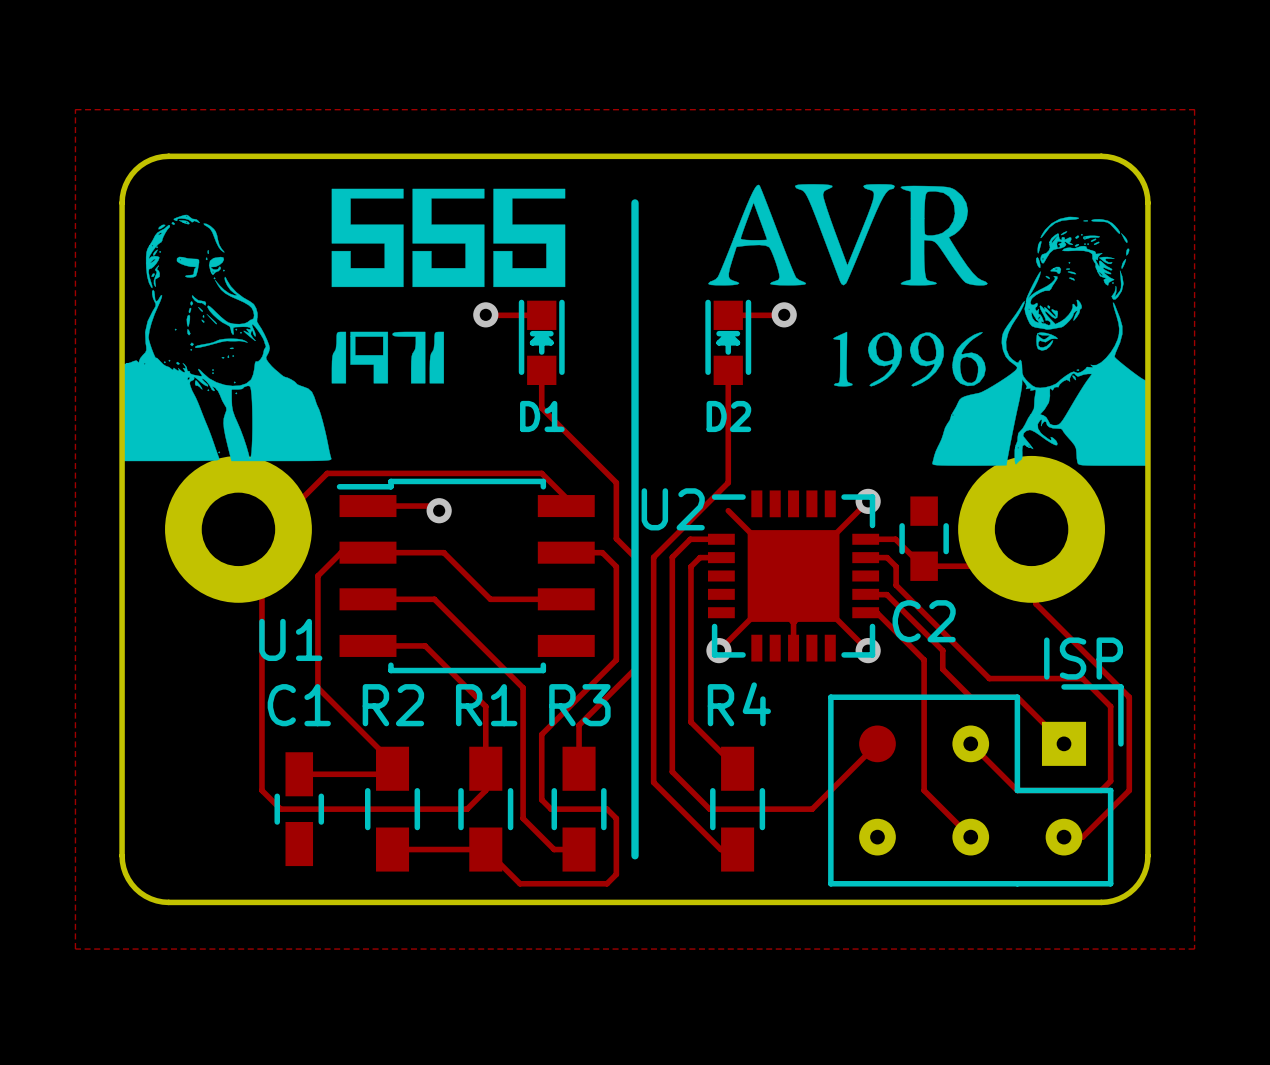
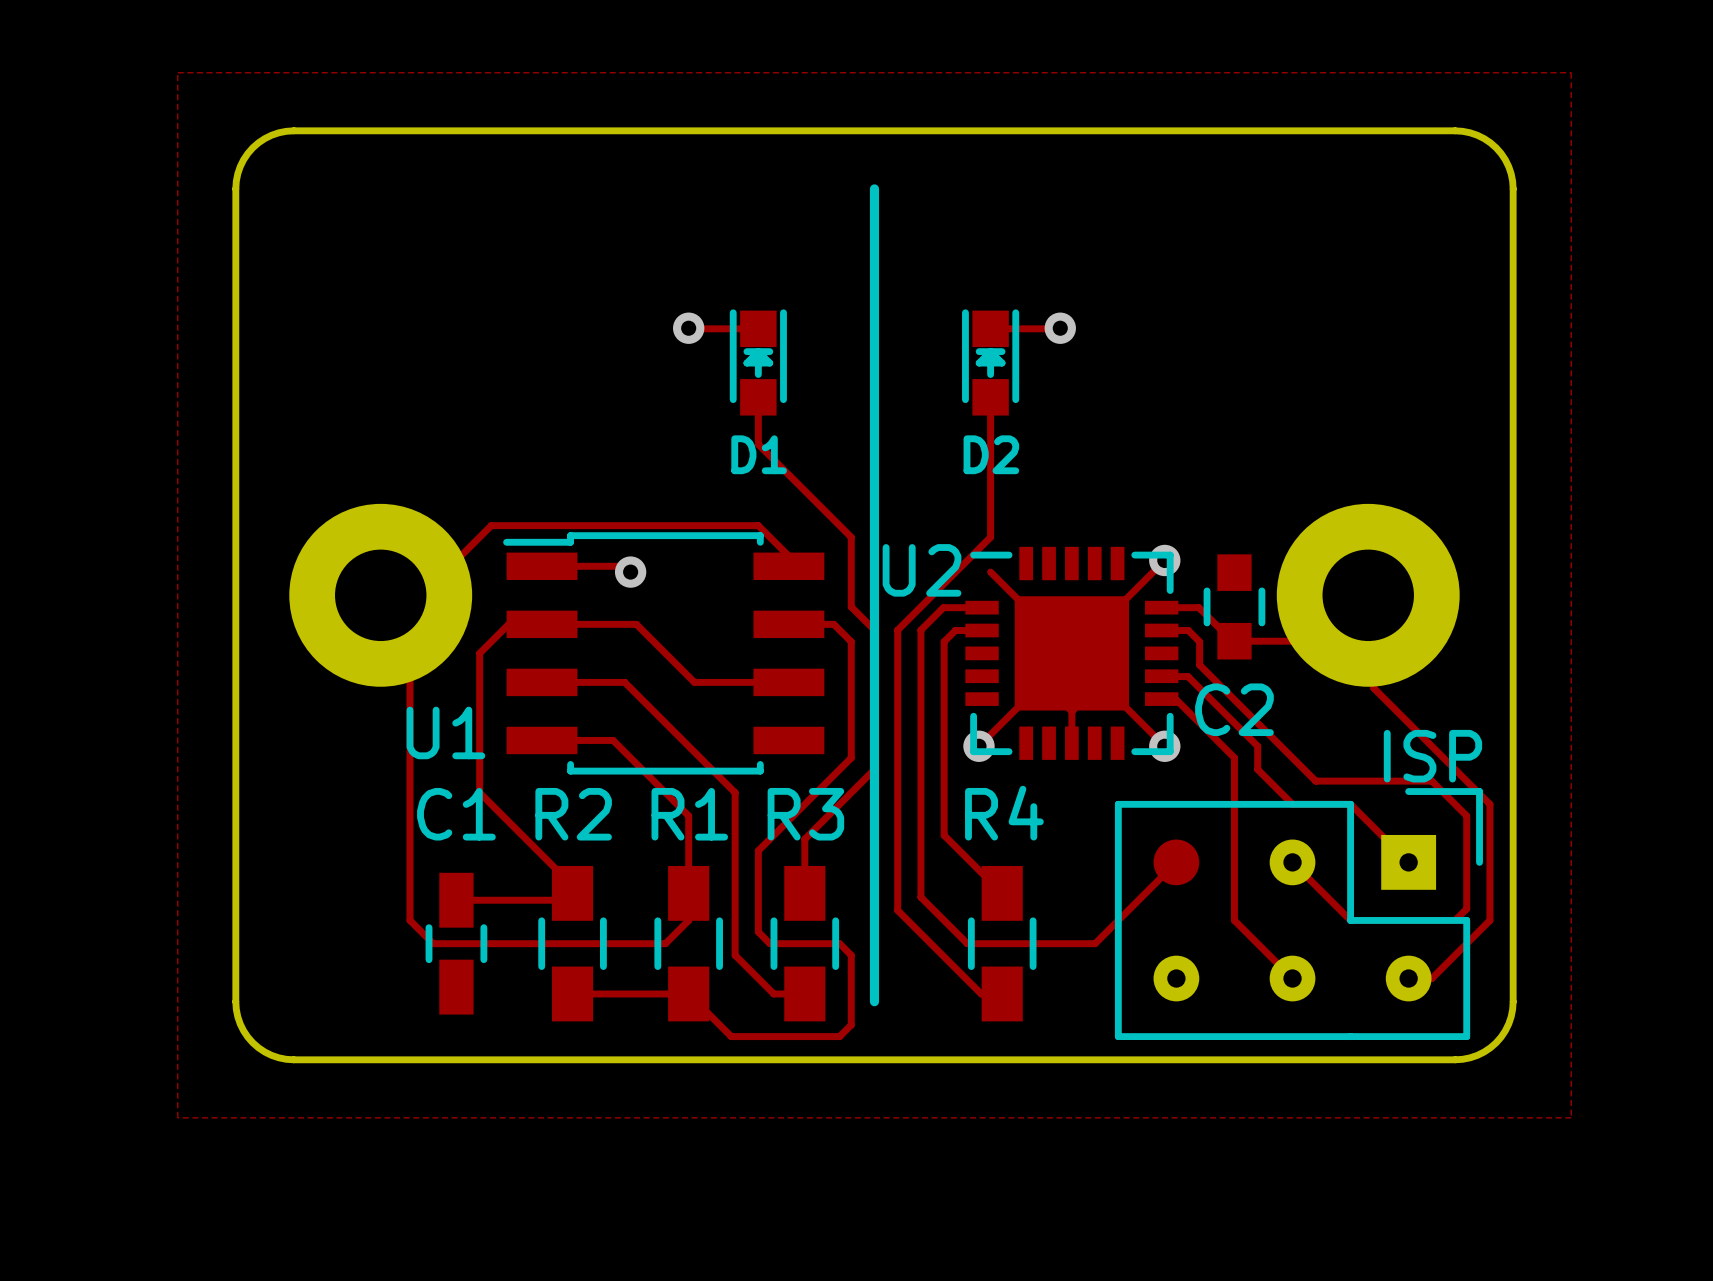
drawing: [708, 184, 1149, 466] -> none
drawing: [121, 188, 566, 462] -> none

